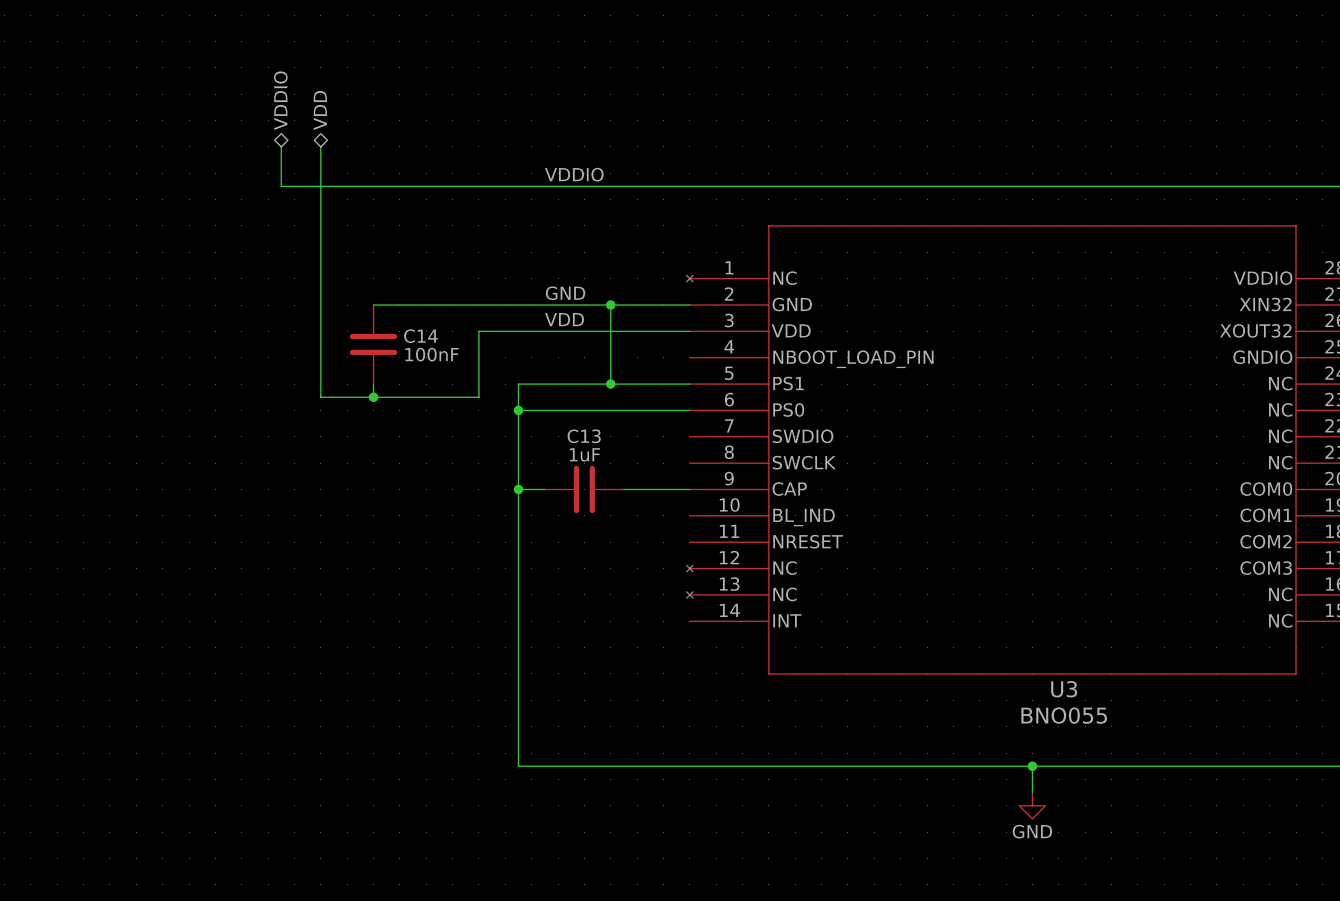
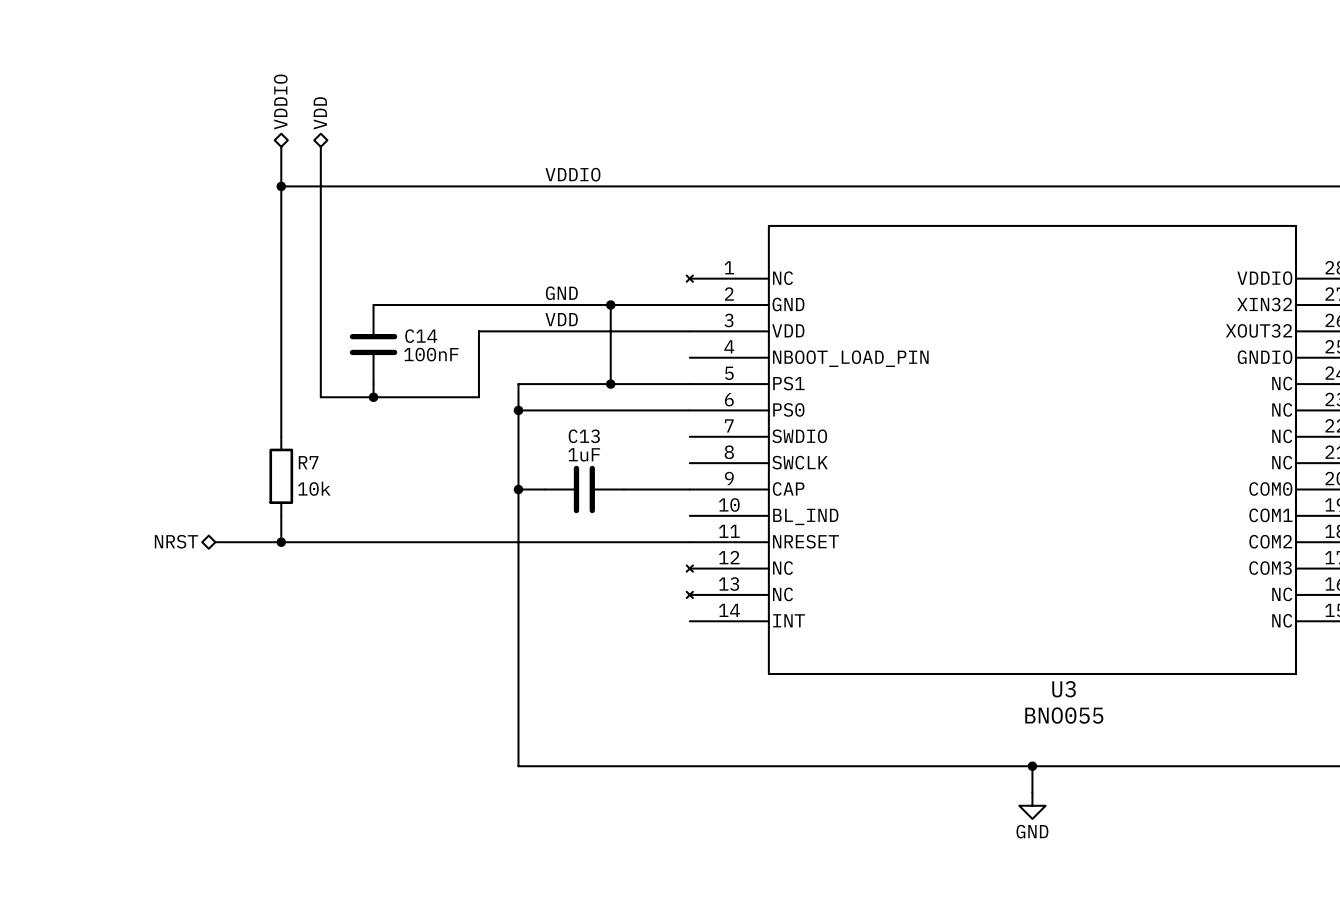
wire: none -> (281, 186) (281, 436)
junction: none -> (281, 186)
R7: none -> 10k (281, 476)
wire: none -> (281, 515) (281, 542)
hierarchical label: none -> NRST (176, 541)
wire: none -> (215, 542) (689, 542)
junction: none -> (281, 542)

